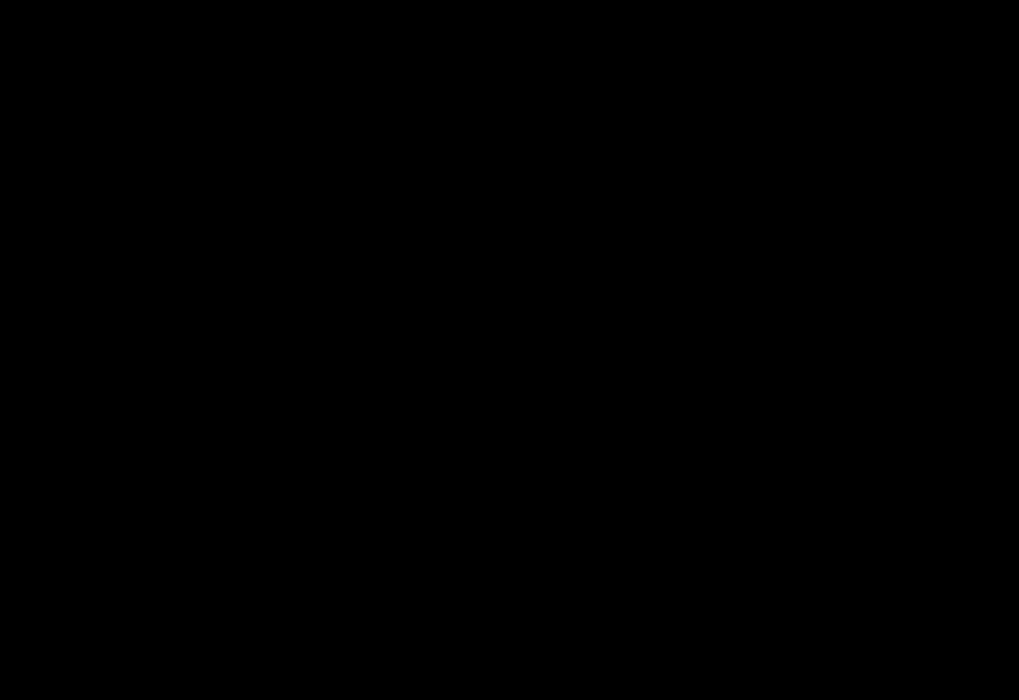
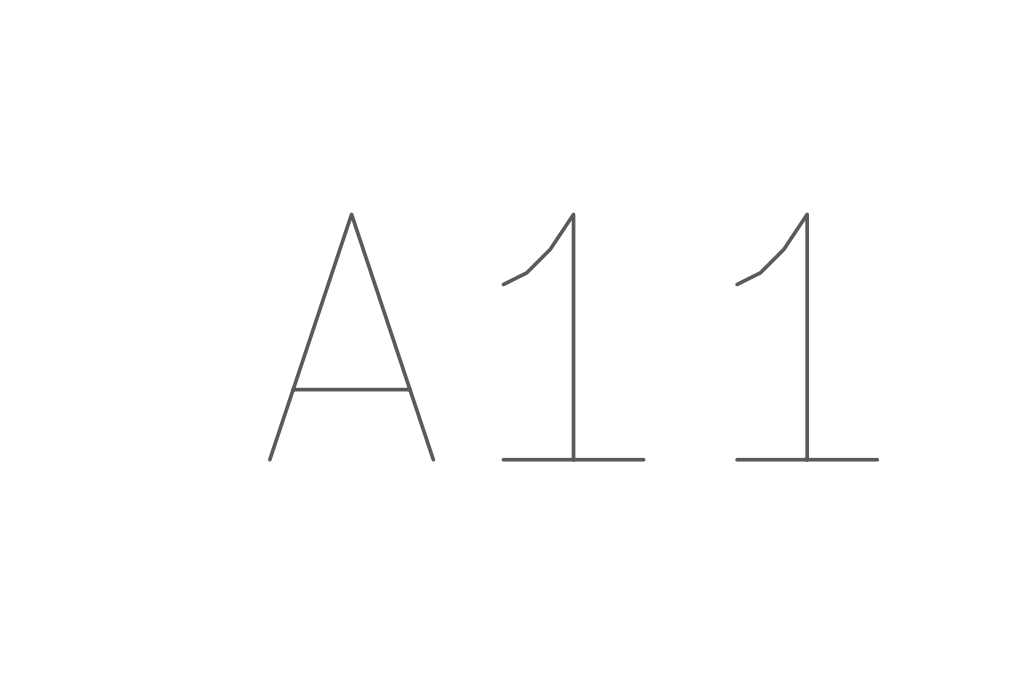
text: none -> A11 (573, 337)

